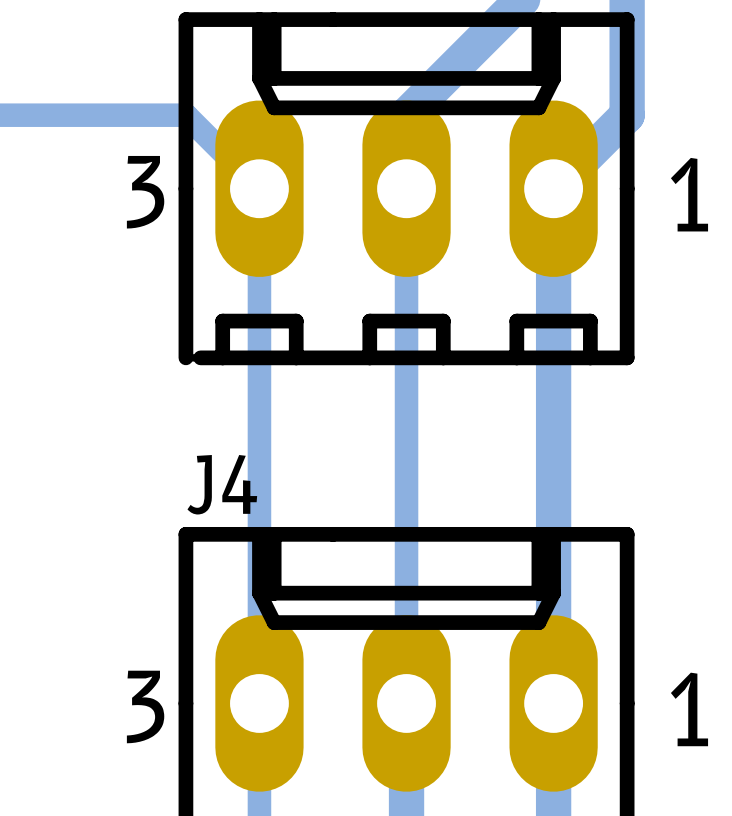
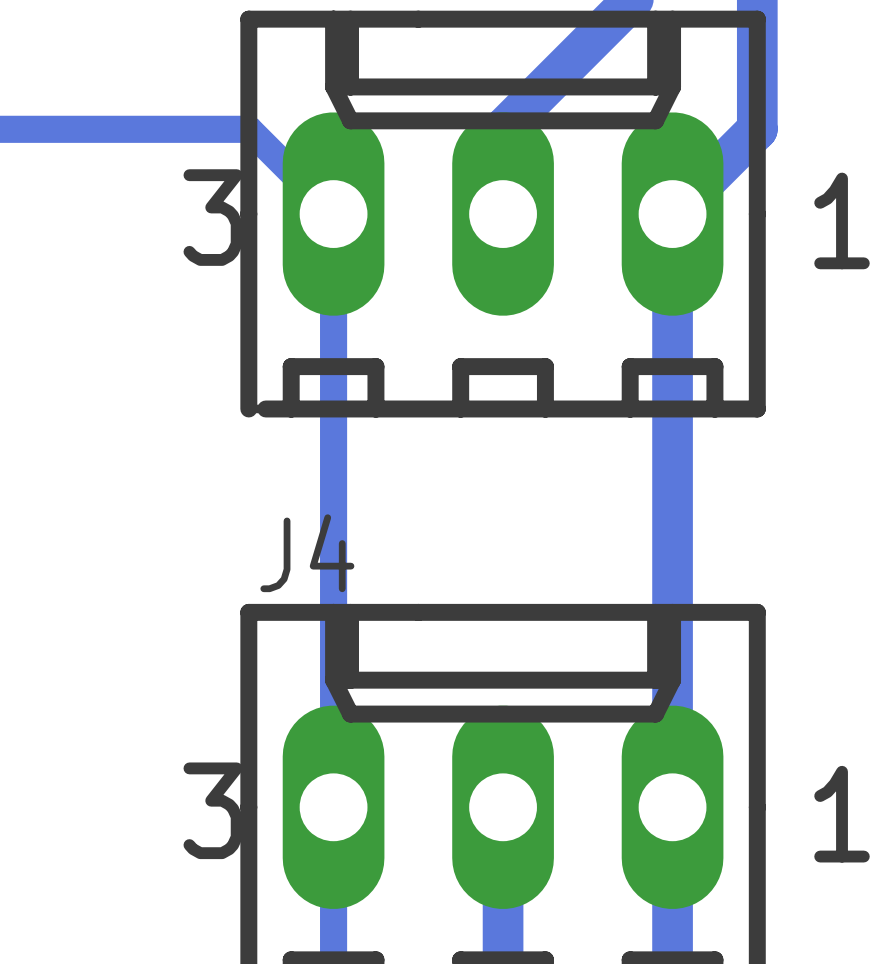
bottom track: (406, 188) (406, 703) -> none

